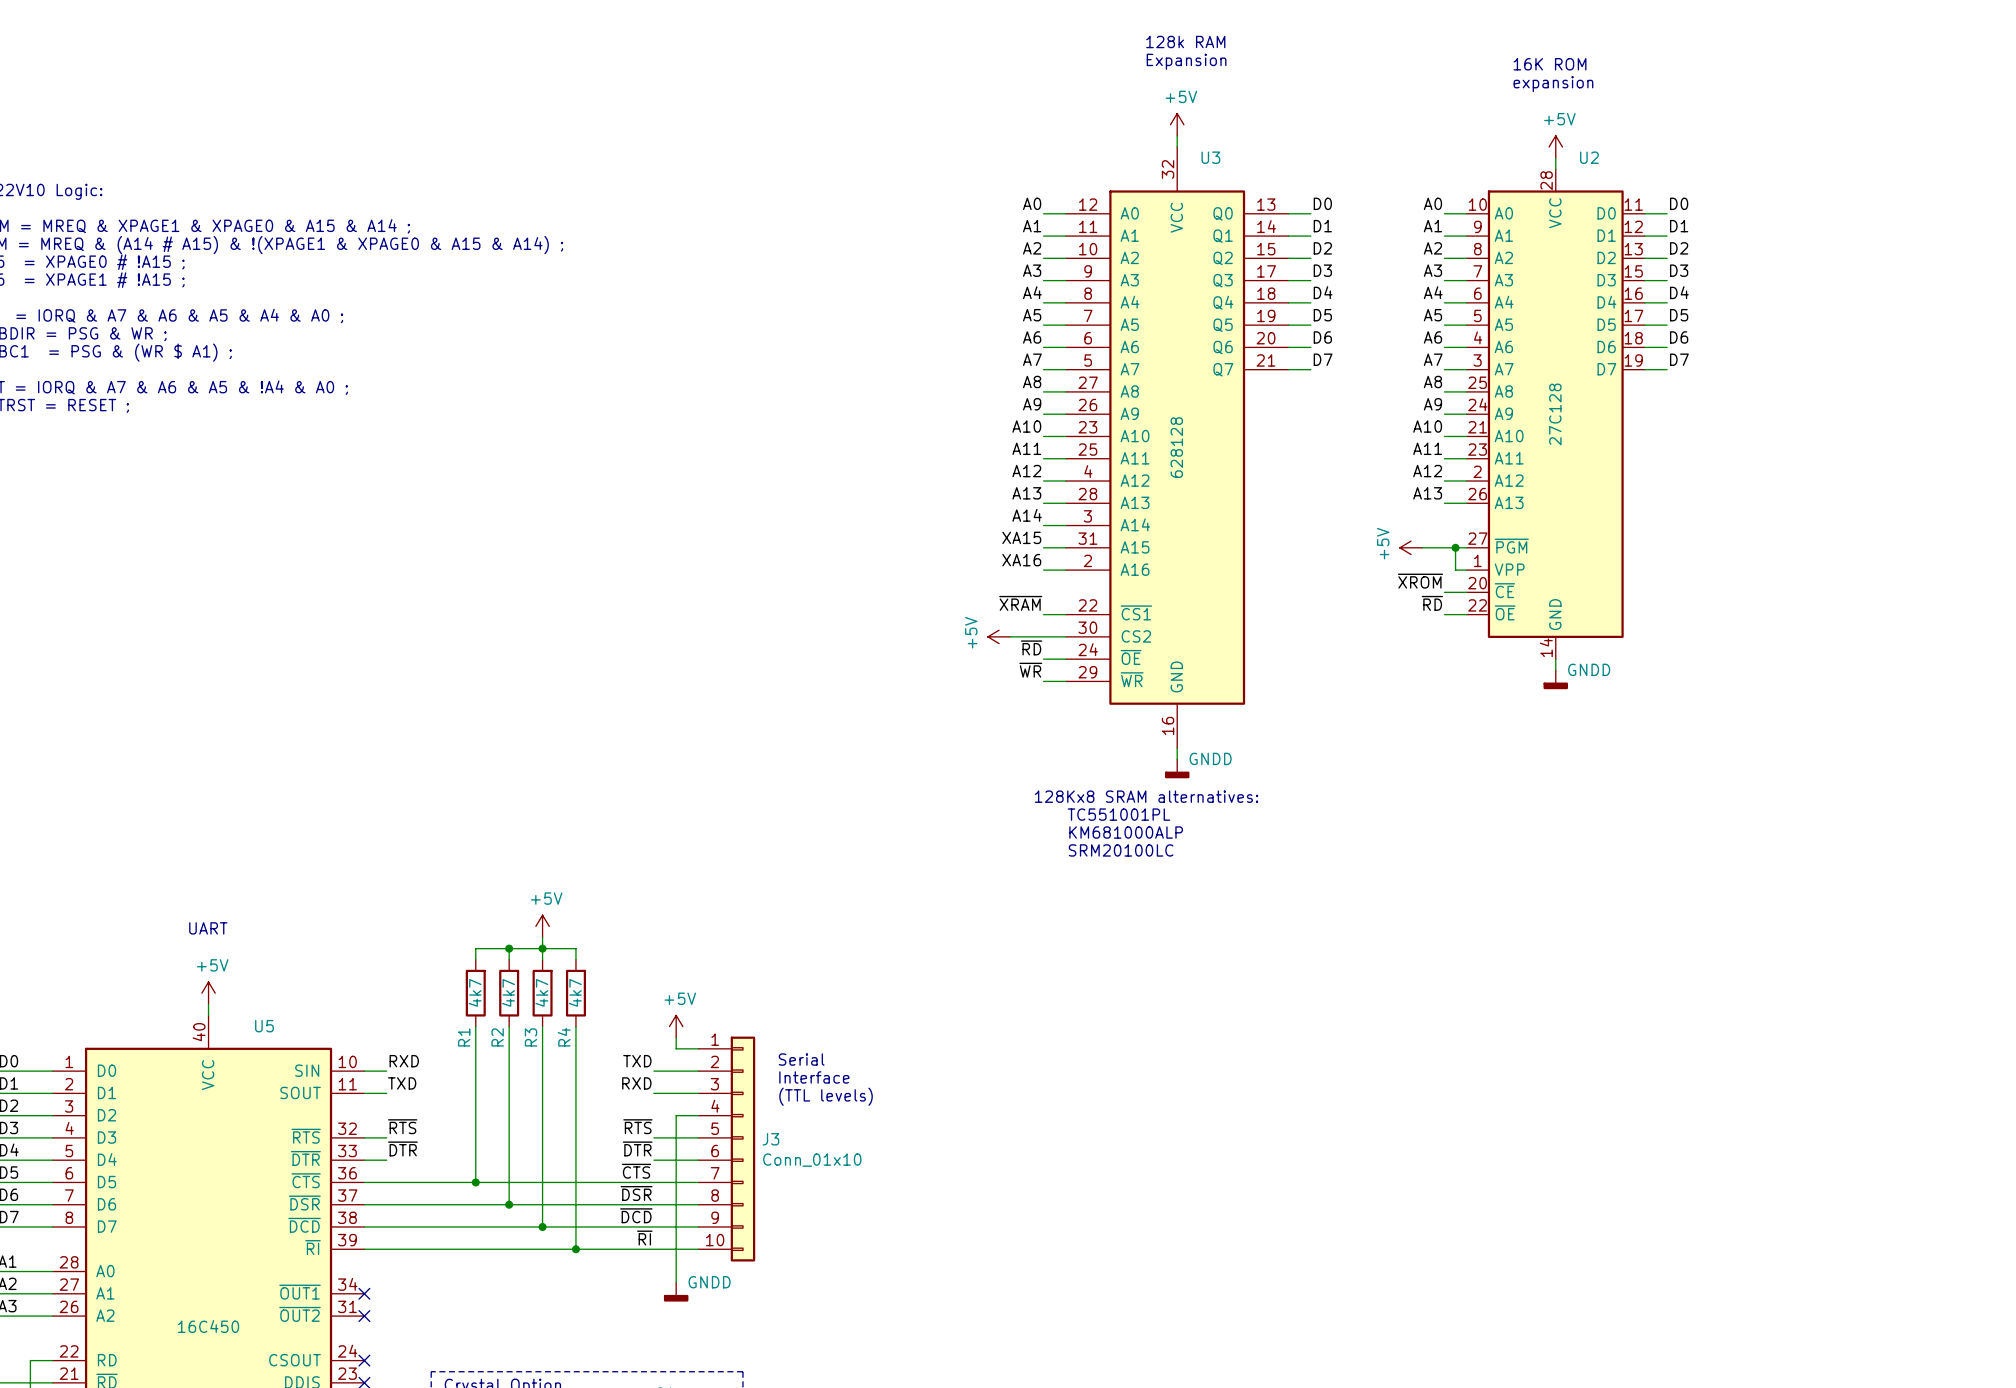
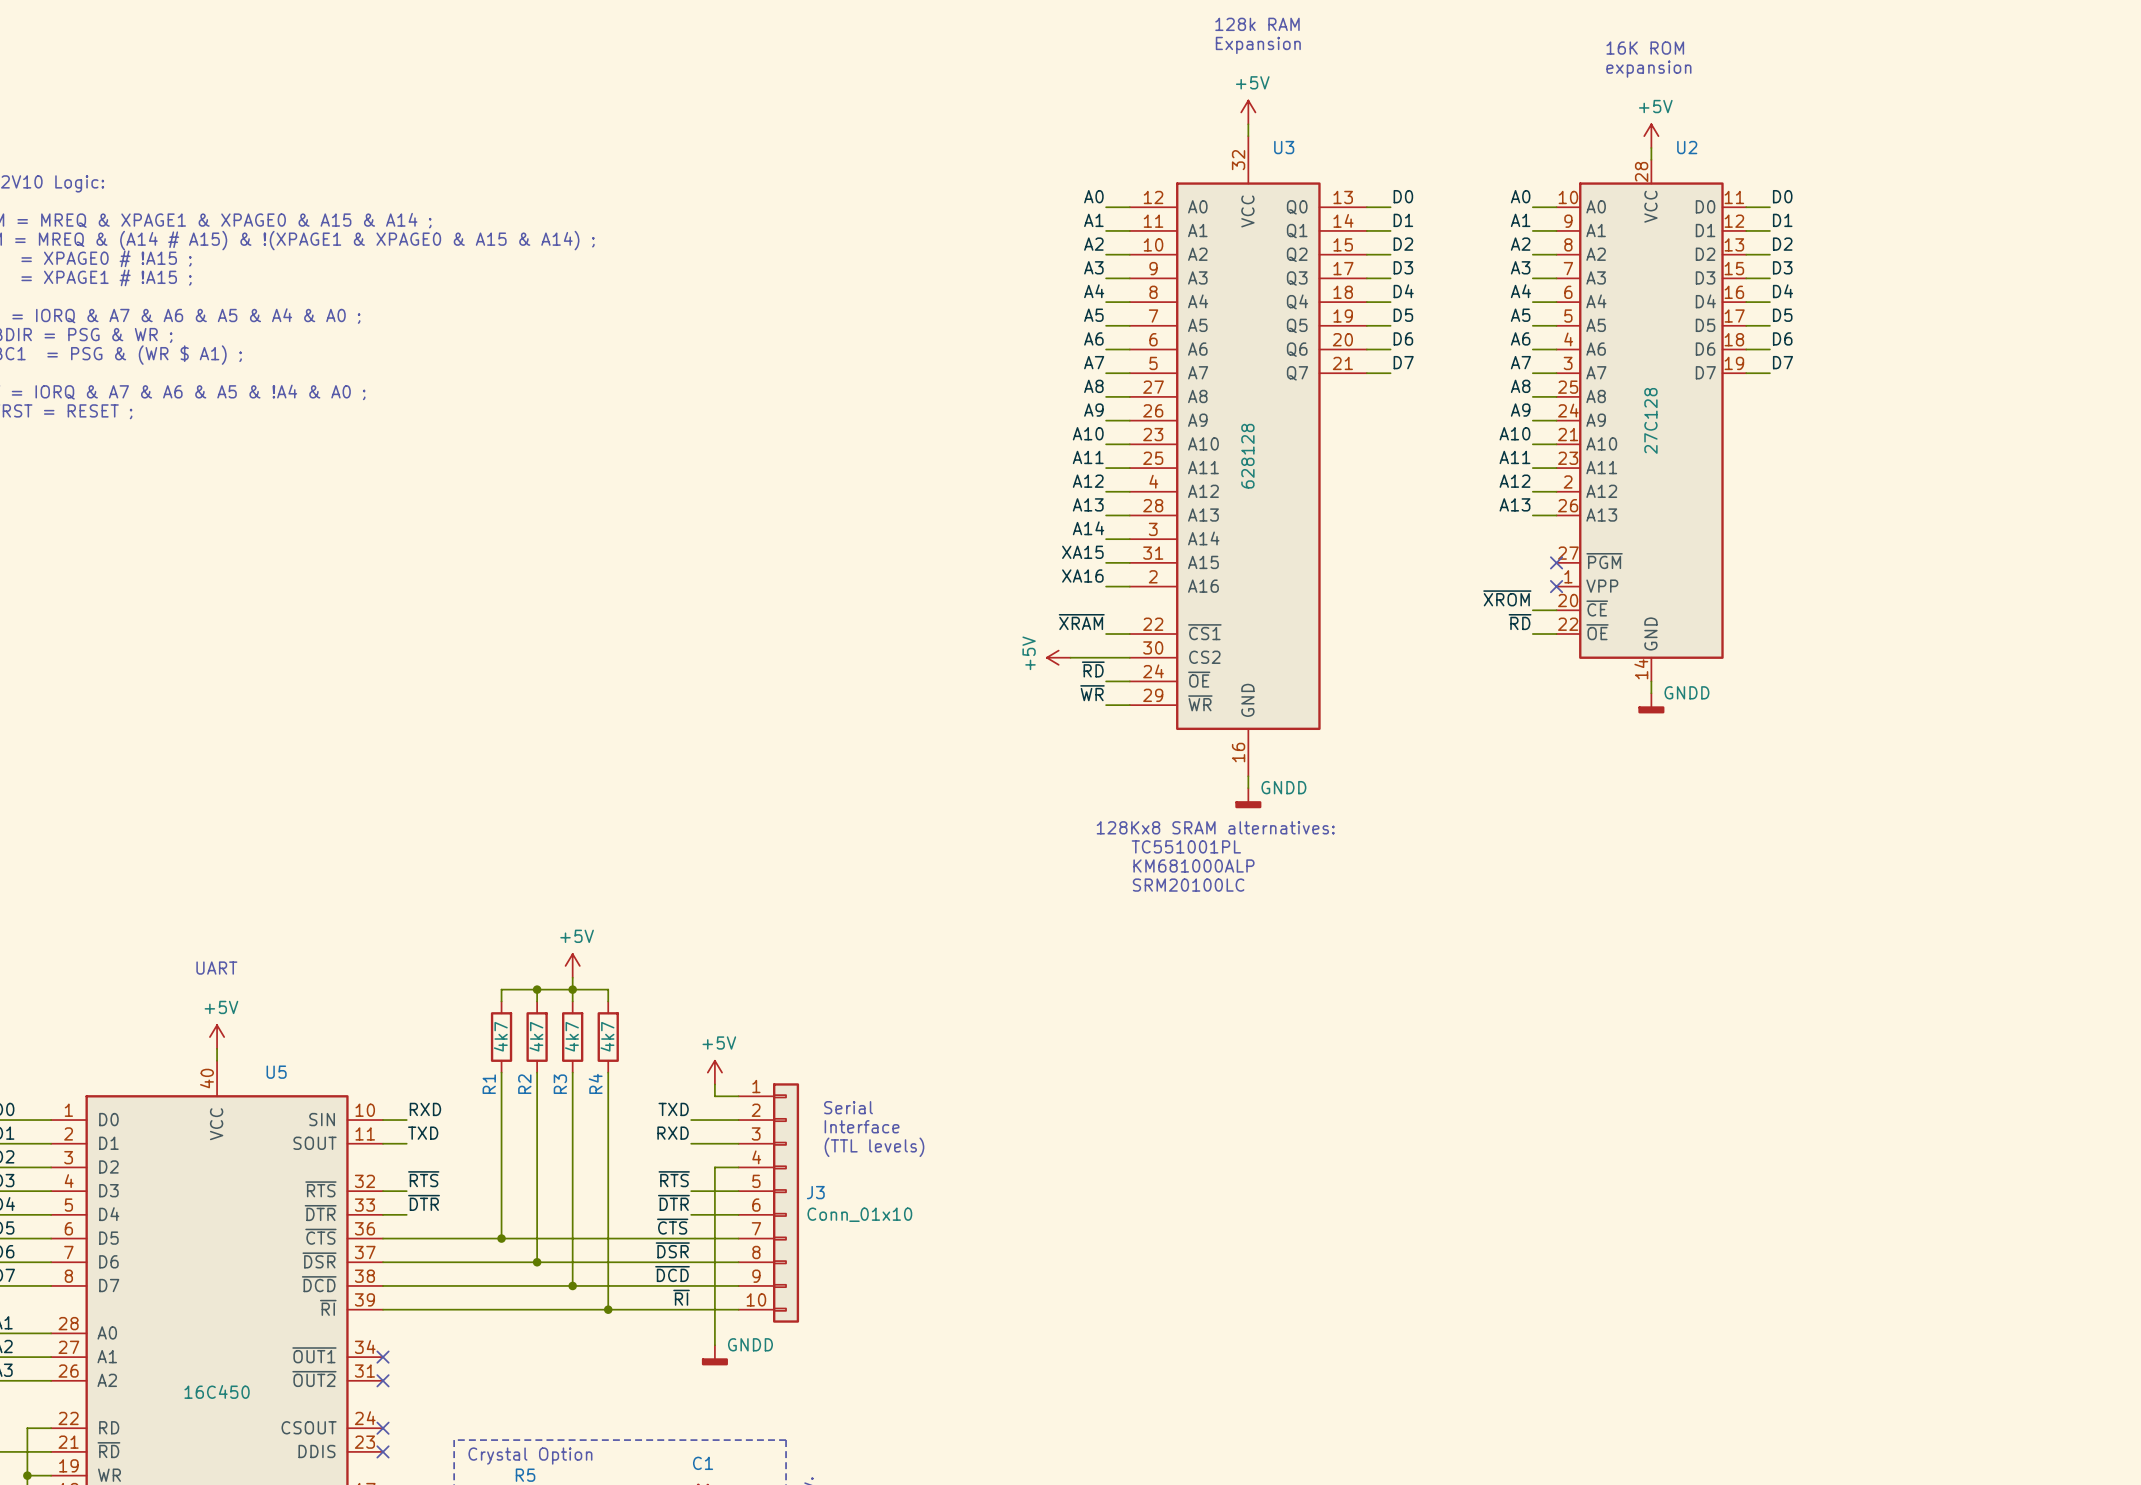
power symbol: +5V (1411, 547) -> none
wire: (1422, 547) (1466, 547) -> none
wire: (1455, 547) (1455, 570) (1466, 570) -> none
junction: (1455, 547) -> none
no-connect mark: none -> (1556, 562)
no-connect mark: none -> (1556, 586)

